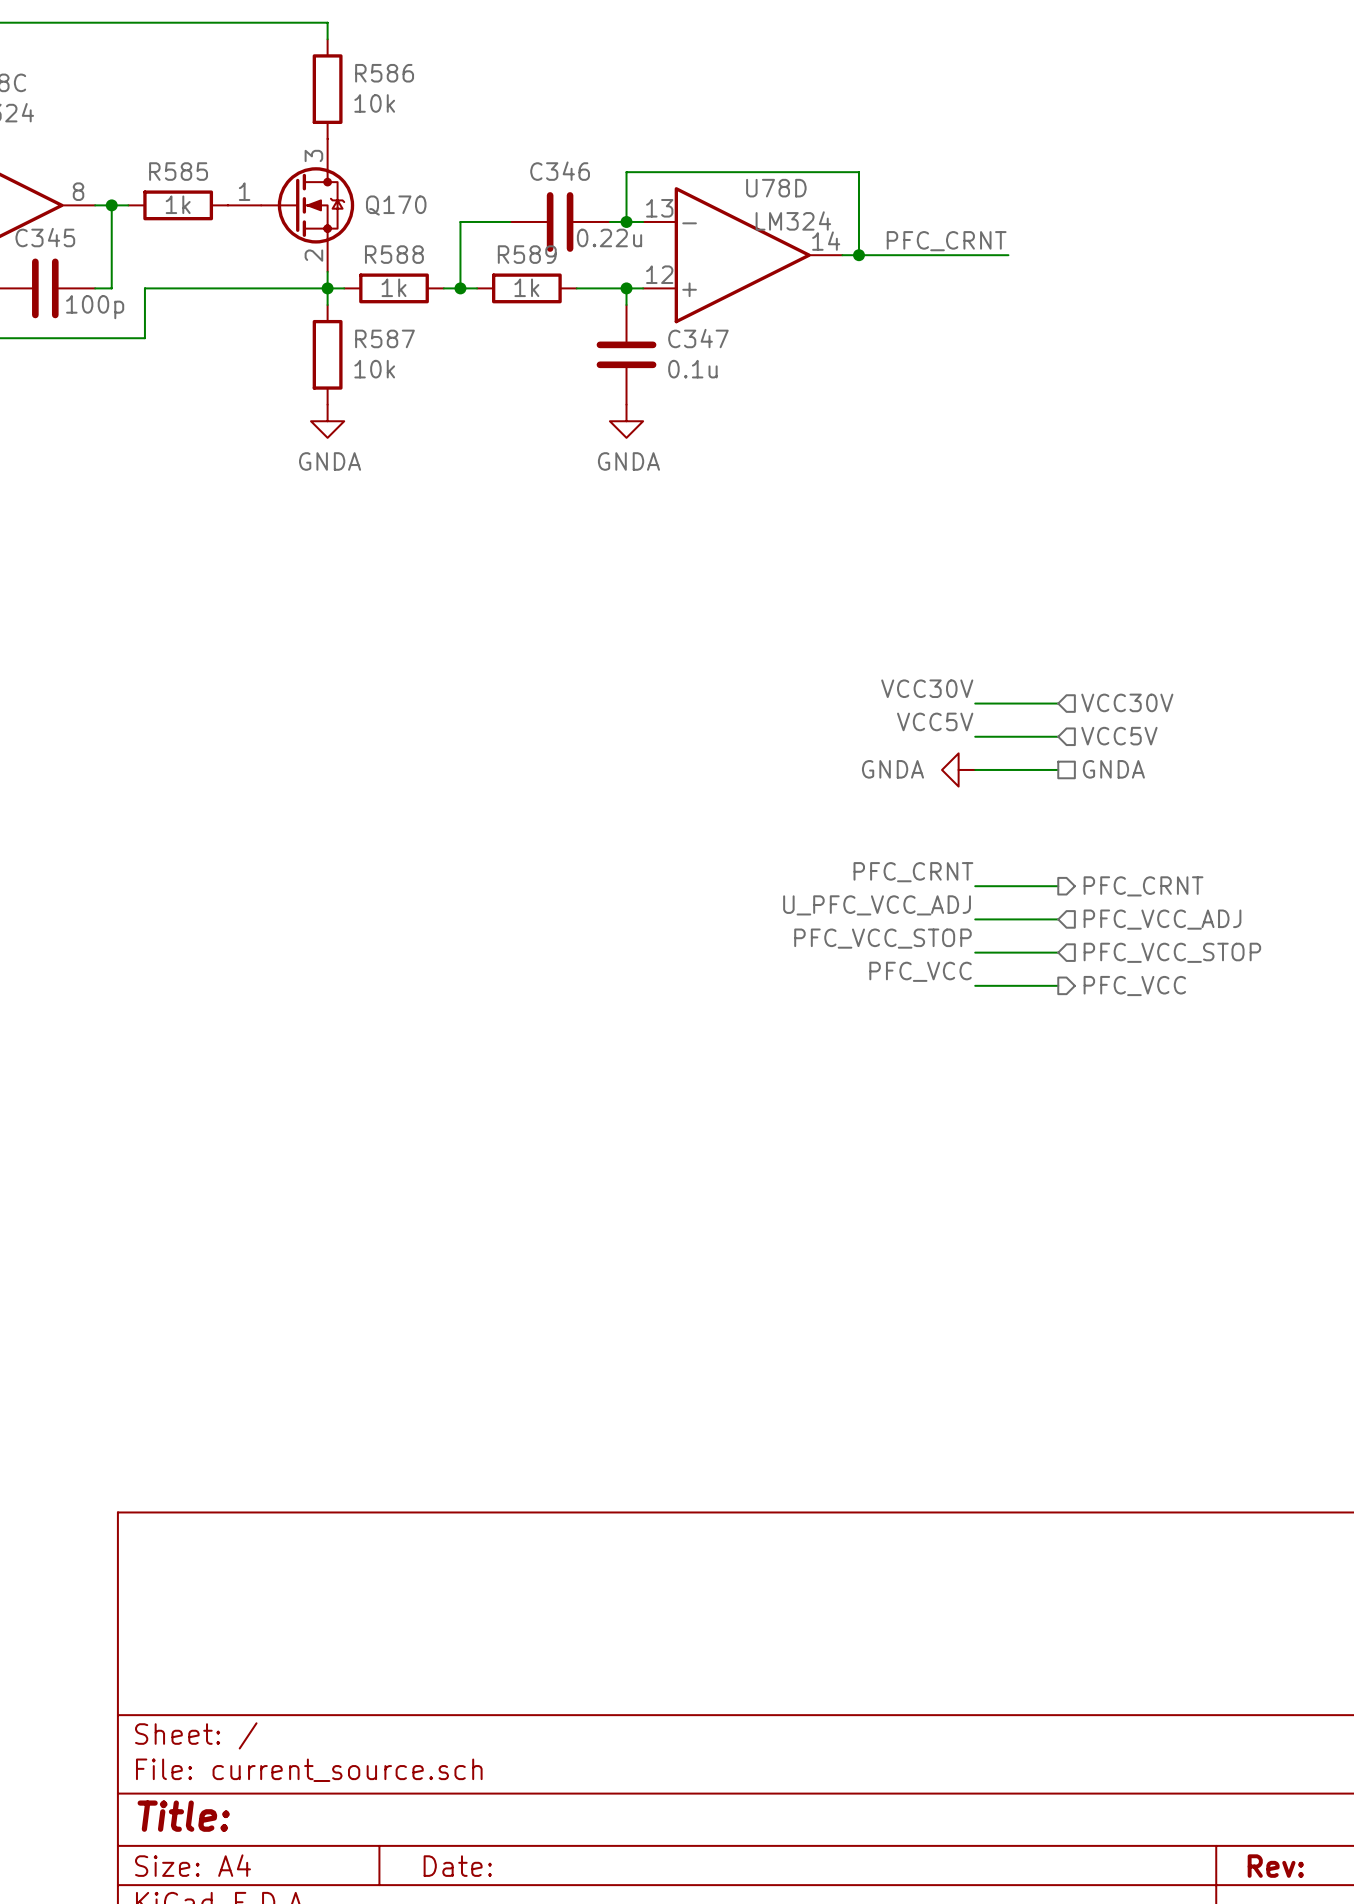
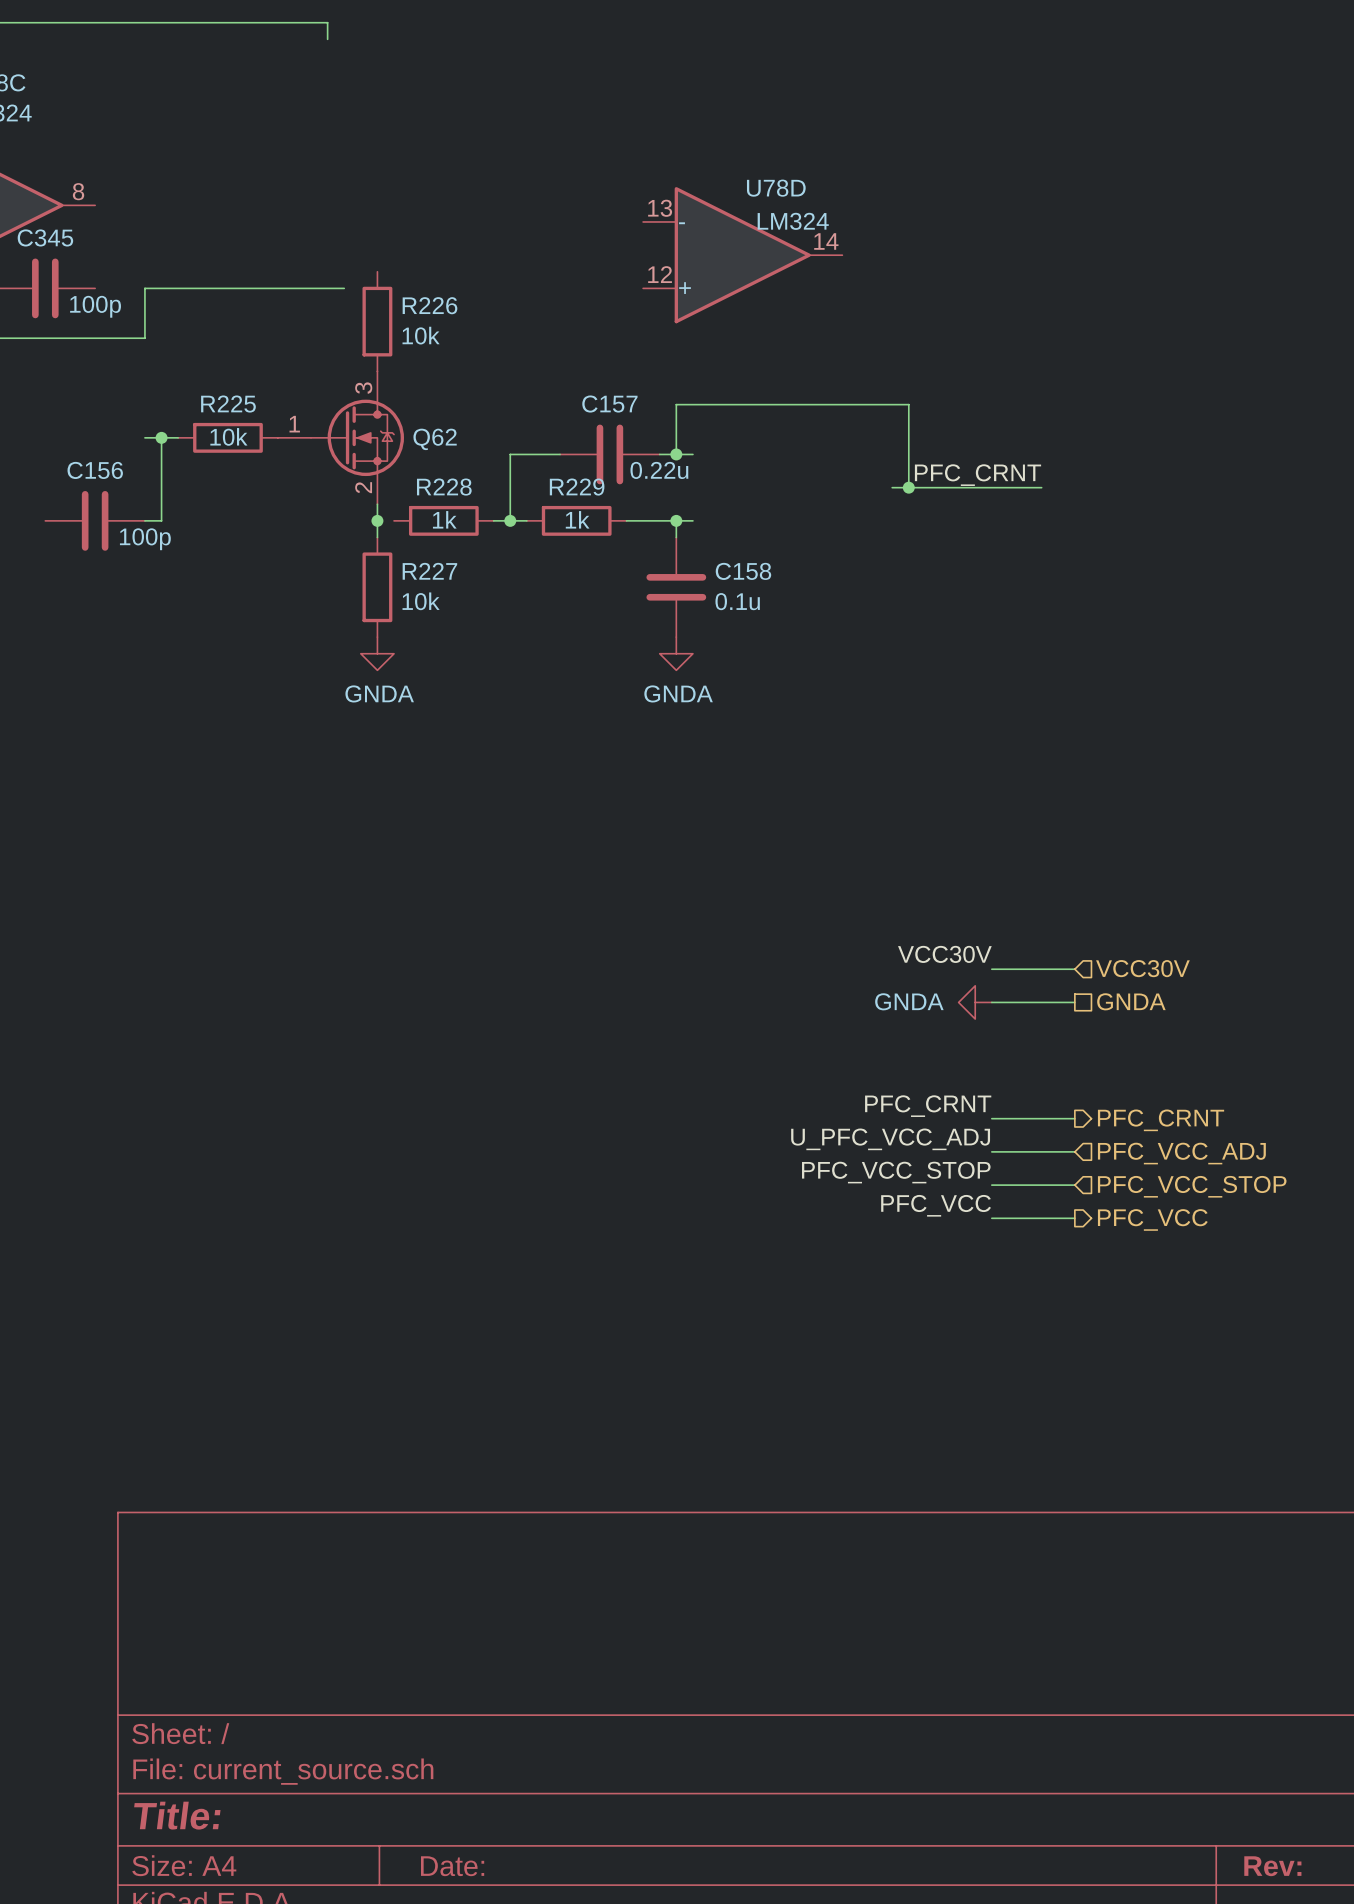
R586: 10k (327, 89) -> none
wire: (95, 205) (128, 205) -> (144, 437) (178, 437)
wire: (111, 205) (111, 288) (95, 288) -> (161, 437) (161, 520) (144, 520)
junction: (111, 205) -> none
R585: 1k (178, 205) -> none
Q170: (291, 205) -> none
wire: (510, 221) (460, 221) (460, 288) -> (560, 454) (510, 454) (510, 520)
C346: 0.22u (560, 221) -> none
wire: (609, 221) (643, 221) -> (659, 454) (692, 454)
wire: (626, 221) (626, 172) (858, 172) (858, 255) -> (676, 454) (676, 404) (908, 404) (908, 487)
junction: (626, 221) -> none
label: PFC_CRNT (946, 241) -> none
wire: (842, 255) (1008, 255) -> none
junction: (858, 255) -> none
wire: (327, 271) (327, 305) -> (377, 504) (377, 537)
junction: (327, 288) -> none
R588: 1k (394, 288) -> none
wire: (443, 288) (477, 288) -> (493, 520) (526, 520)
junction: (460, 288) -> none
R589: 1k (526, 288) -> none
wire: (576, 288) (643, 288) -> (626, 520) (692, 520)
wire: (626, 288) (626, 305) -> (676, 520) (676, 537)
junction: (626, 288) -> none
R226: none -> 10k (377, 321)
R587: 10k (327, 354) -> none
C347: 0.1u (626, 354) -> none
power symbol: GNDA (327, 421) -> none
power symbol: GNDA (626, 421) -> none
junction: none -> (161, 437)
R225: none -> 10k (227, 437)
Q62: none -> (340, 437)
C157: none -> 0.22u (609, 454)
junction: none -> (676, 454)
label: none -> PFC_CRNT (978, 475)
wire: none -> (892, 487) (1041, 487)
junction: none -> (908, 487)
C156: none -> 100p (95, 520)
junction: none -> (377, 520)
R228: none -> 1k (443, 520)
junction: none -> (510, 520)
R229: none -> 1k (576, 520)
junction: none -> (676, 520)
R227: none -> 10k (377, 587)
C158: none -> 0.1u (676, 587)
power symbol: none -> GNDA (377, 653)
power symbol: none -> GNDA (676, 653)
label position: VCC30V (927, 688) -> VCC30V (944, 954)
hierarchical label position: VCC30V (1127, 702) -> VCC30V (1142, 968)
wire: (975, 703) (1058, 703) -> none
label: VCC5V (935, 721) -> none
wire: (975, 736) (1058, 736) -> (991, 969) (1074, 969)
hierarchical label: VCC5V (1119, 736) -> none
power symbol: GNDA (958, 769) -> none
wire: (975, 769) (1058, 769) -> (991, 1002) (1074, 1002)
hierarchical label position: GNDA (1113, 769) -> GNDA (1131, 1001)
label: PFC_CRNT (913, 872) -> none
wire: (975, 886) (1058, 886) -> (991, 1118) (1074, 1118)
hierarchical label position: PFC_CRNT (1143, 886) -> PFC_CRNT (1161, 1120)
label position: U_PFC_VCC_ADJ (877, 905) -> U_PFC_VCC_ADJ (890, 1139)
wire: (975, 919) (1058, 919) -> (991, 1151) (1074, 1151)
hierarchical label position: PFC_VCC_ADJ (1162, 919) -> PFC_VCC_ADJ (1181, 1153)
label position: PFC_VCC_STOP (882, 938) -> PFC_VCC_STOP (896, 1172)
wire: (975, 952) (1058, 952) -> (991, 1185) (1074, 1185)
hierarchical label position: PFC_VCC_STOP (1172, 952) -> PFC_VCC_STOP (1192, 1186)
label position: PFC_VCC (920, 971) -> PFC_VCC (936, 1205)
wire: (975, 985) (1058, 985) -> (991, 1218) (1074, 1218)
hierarchical label position: PFC_VCC (1134, 986) -> PFC_VCC (1152, 1219)
power symbol: none -> GNDA (975, 1002)
label: none -> PFC_CRNT (928, 1106)

